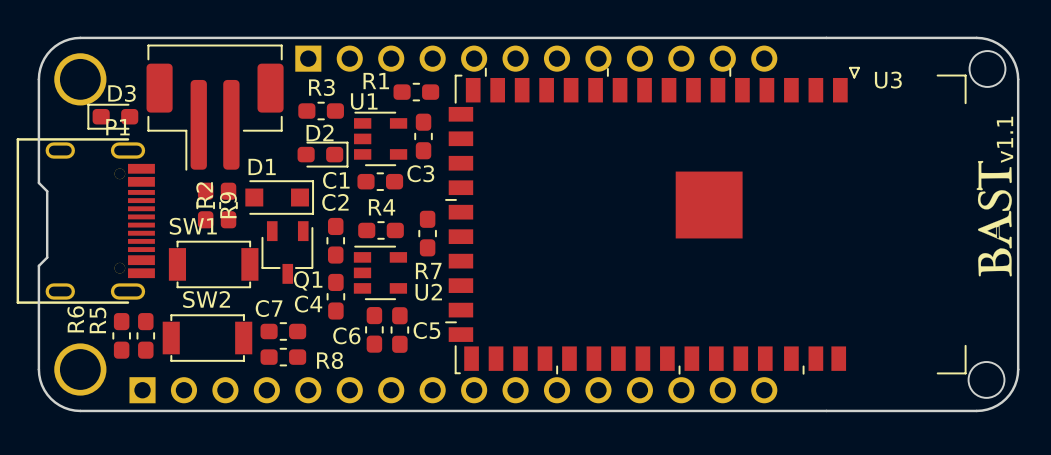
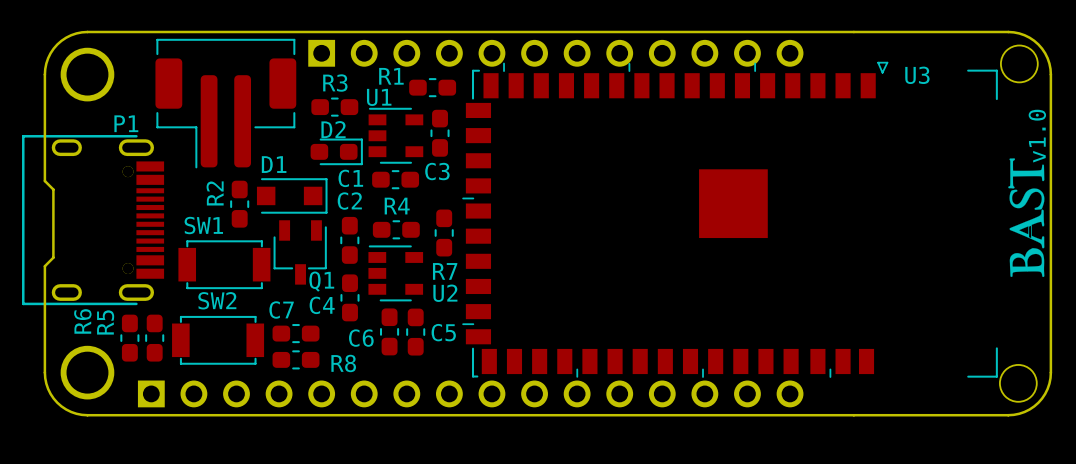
D3: (112, 116) -> none
text: v1.1 (1005, 139) -> v1.0 (1037, 136)
R9: (205, 205) -> none

